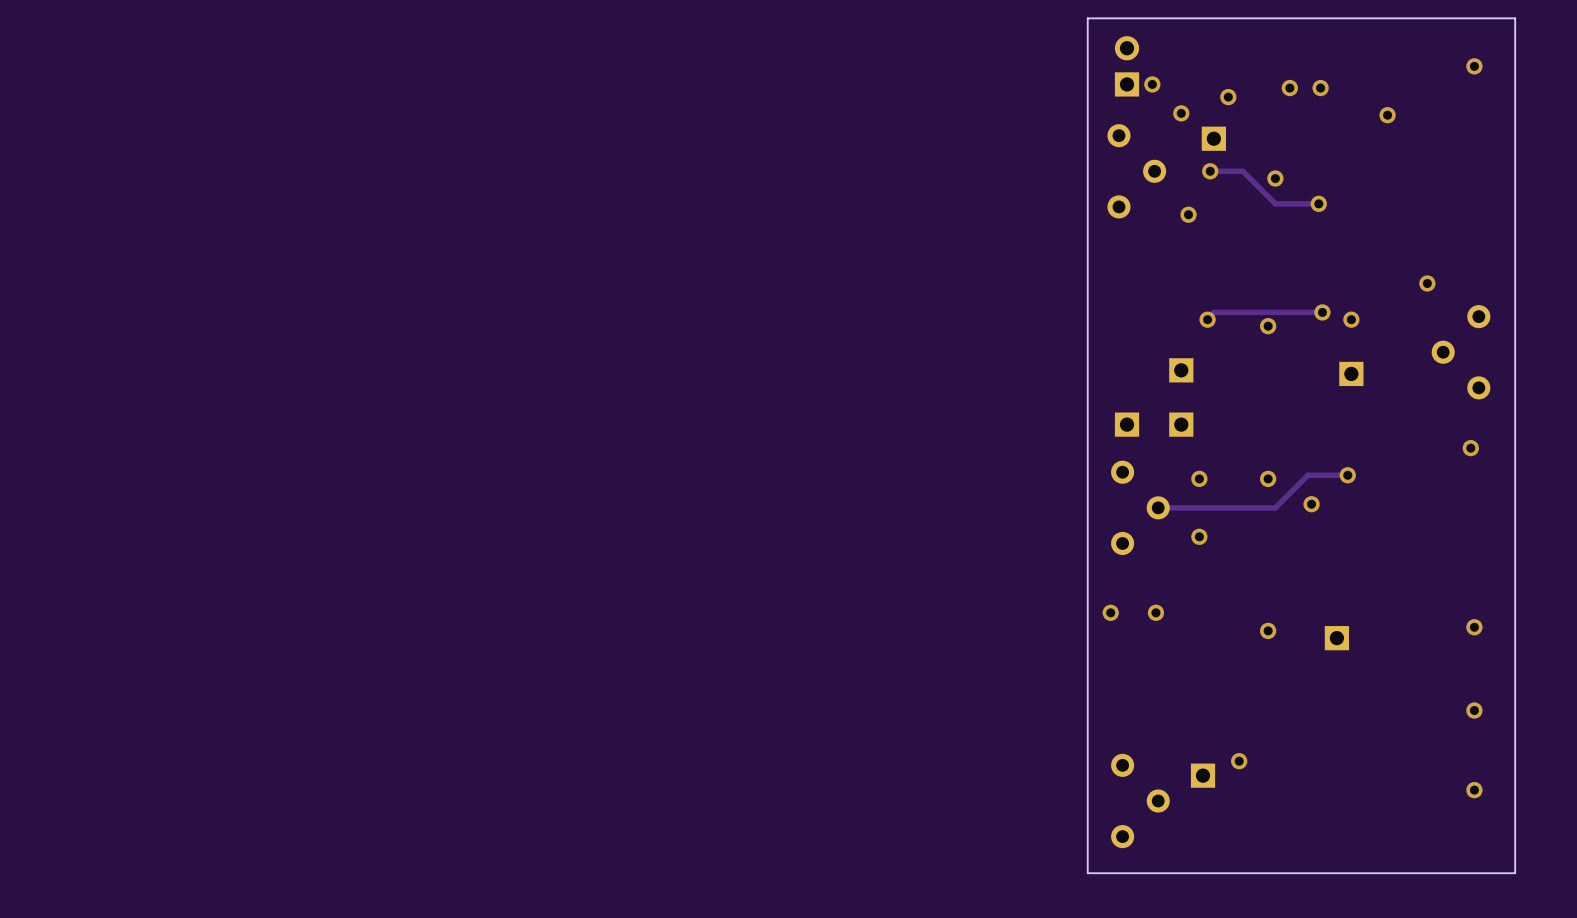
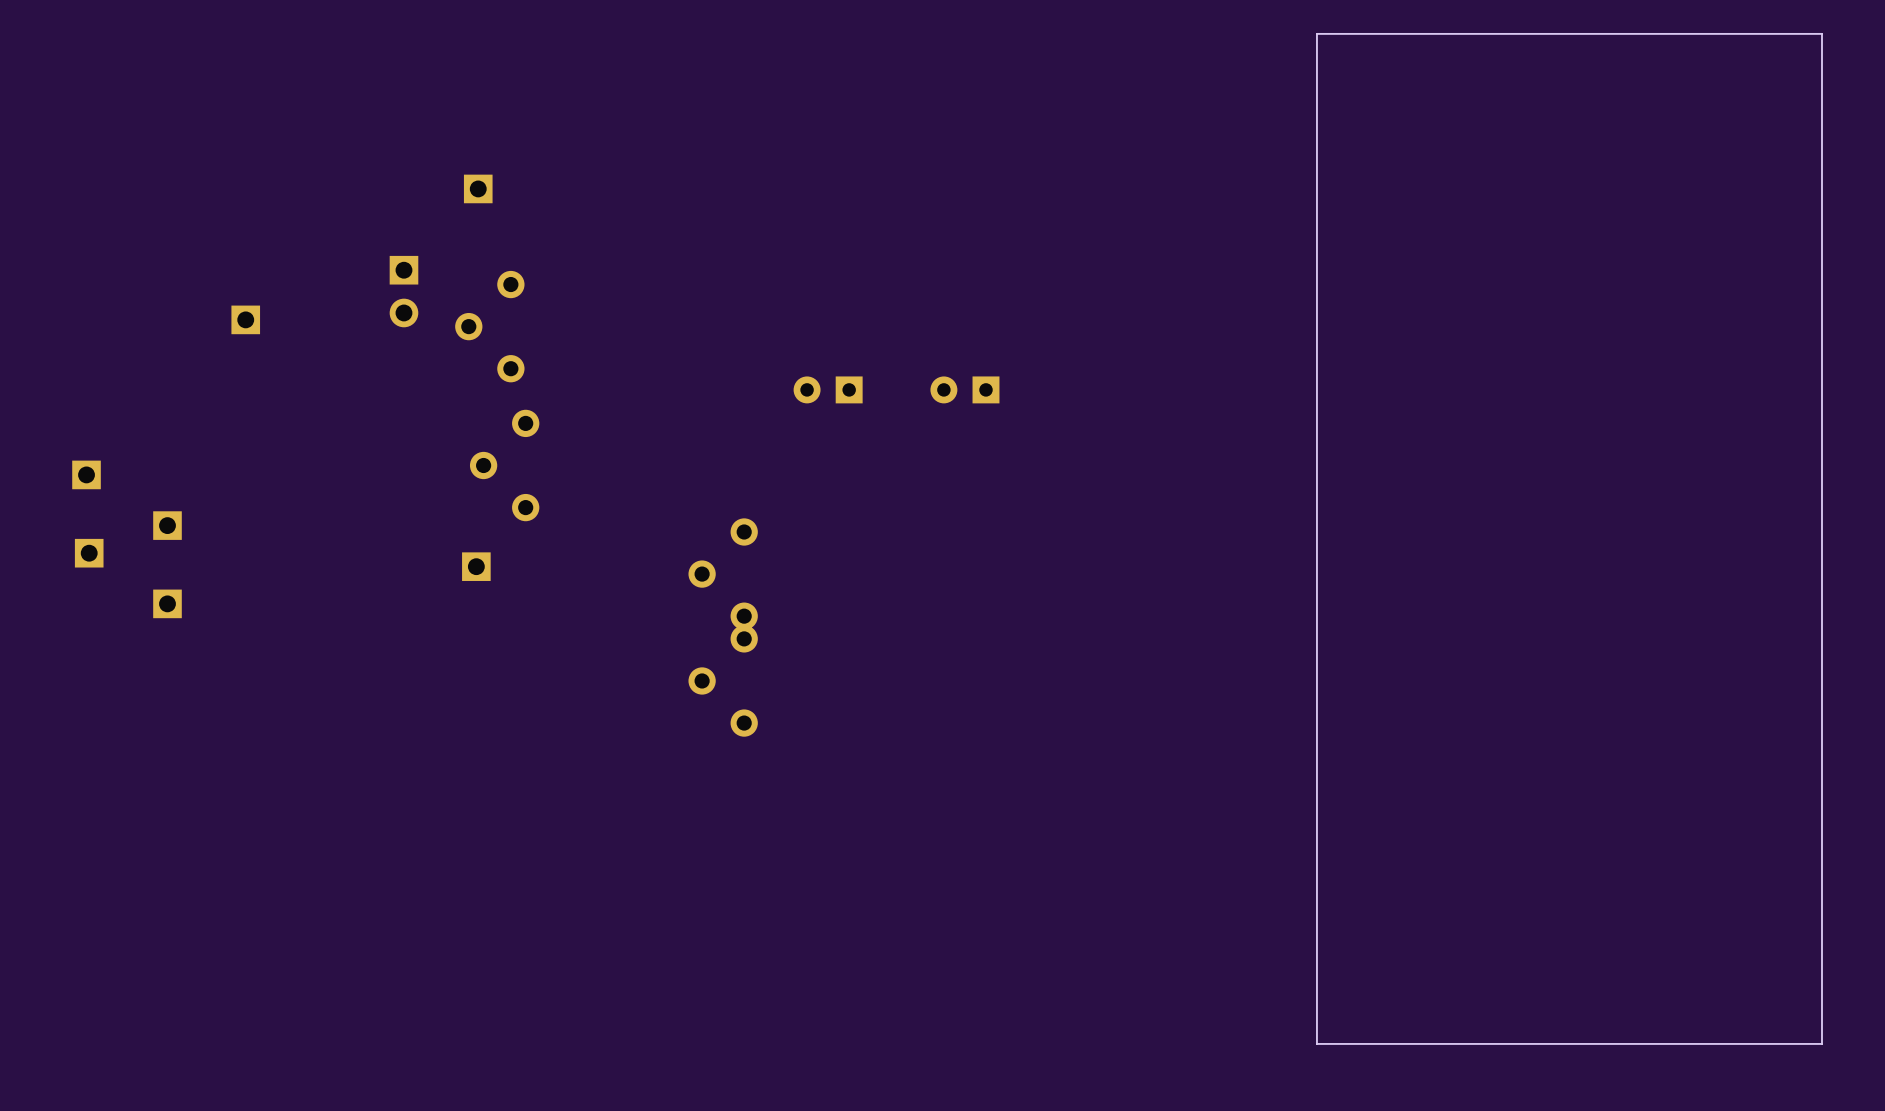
part: (1127, 66) -> none
via: (1474, 66) -> none
via: (1152, 84) -> none
via: (1289, 88) -> none
via: (1320, 88) -> none
via: (1228, 97) -> none
via: (1181, 113) -> none
via: (1387, 115) -> none
part: (1213, 138) -> none
part: none -> (478, 188)
part: (1136, 171) -> none
track: (1210, 171) (1242, 171) (1275, 203) (1318, 203) -> none
via: (1210, 171) -> none
via: (1275, 178) -> none
via: (1318, 203) -> none
via: (1188, 214) -> none
part: none -> (403, 291)
part: none -> (245, 319)
part: none -> (489, 326)
via: (1427, 283) -> none
track: (1322, 312) (1213, 312) (1207, 319) -> none
via: (1322, 312) -> none
part: none -> (828, 389)
part: none -> (964, 389)
via: (1207, 319) -> none
via: (1351, 319) -> none
via: (1268, 326) -> none
part: (1461, 352) -> none
part: (1181, 370) -> none
part: (1351, 373) -> none
part: none -> (504, 465)
part: none -> (86, 474)
part: (1127, 424) -> none
part: (1181, 424) -> none
part: none -> (167, 525)
via: (1470, 448) -> none
part: none -> (89, 553)
part: none -> (476, 566)
part: none -> (723, 574)
track: (1347, 475) (1307, 475) (1275, 507) (1158, 507) -> none
via: (1347, 475) -> none
via: (1199, 478) -> none
via: (1268, 478) -> none
part: none -> (167, 603)
via: (1311, 504) -> none
part: (1140, 507) -> none
via: (1199, 536) -> none
part: none -> (723, 680)
via: (1110, 612) -> none
via: (1155, 612) -> none
via: (1474, 627) -> none
via: (1268, 630) -> none
part: (1336, 638) -> none
via: (1474, 710) -> none
via: (1239, 761) -> none
part: (1203, 775) -> none
via: (1474, 790) -> none
part: (1140, 800) -> none

